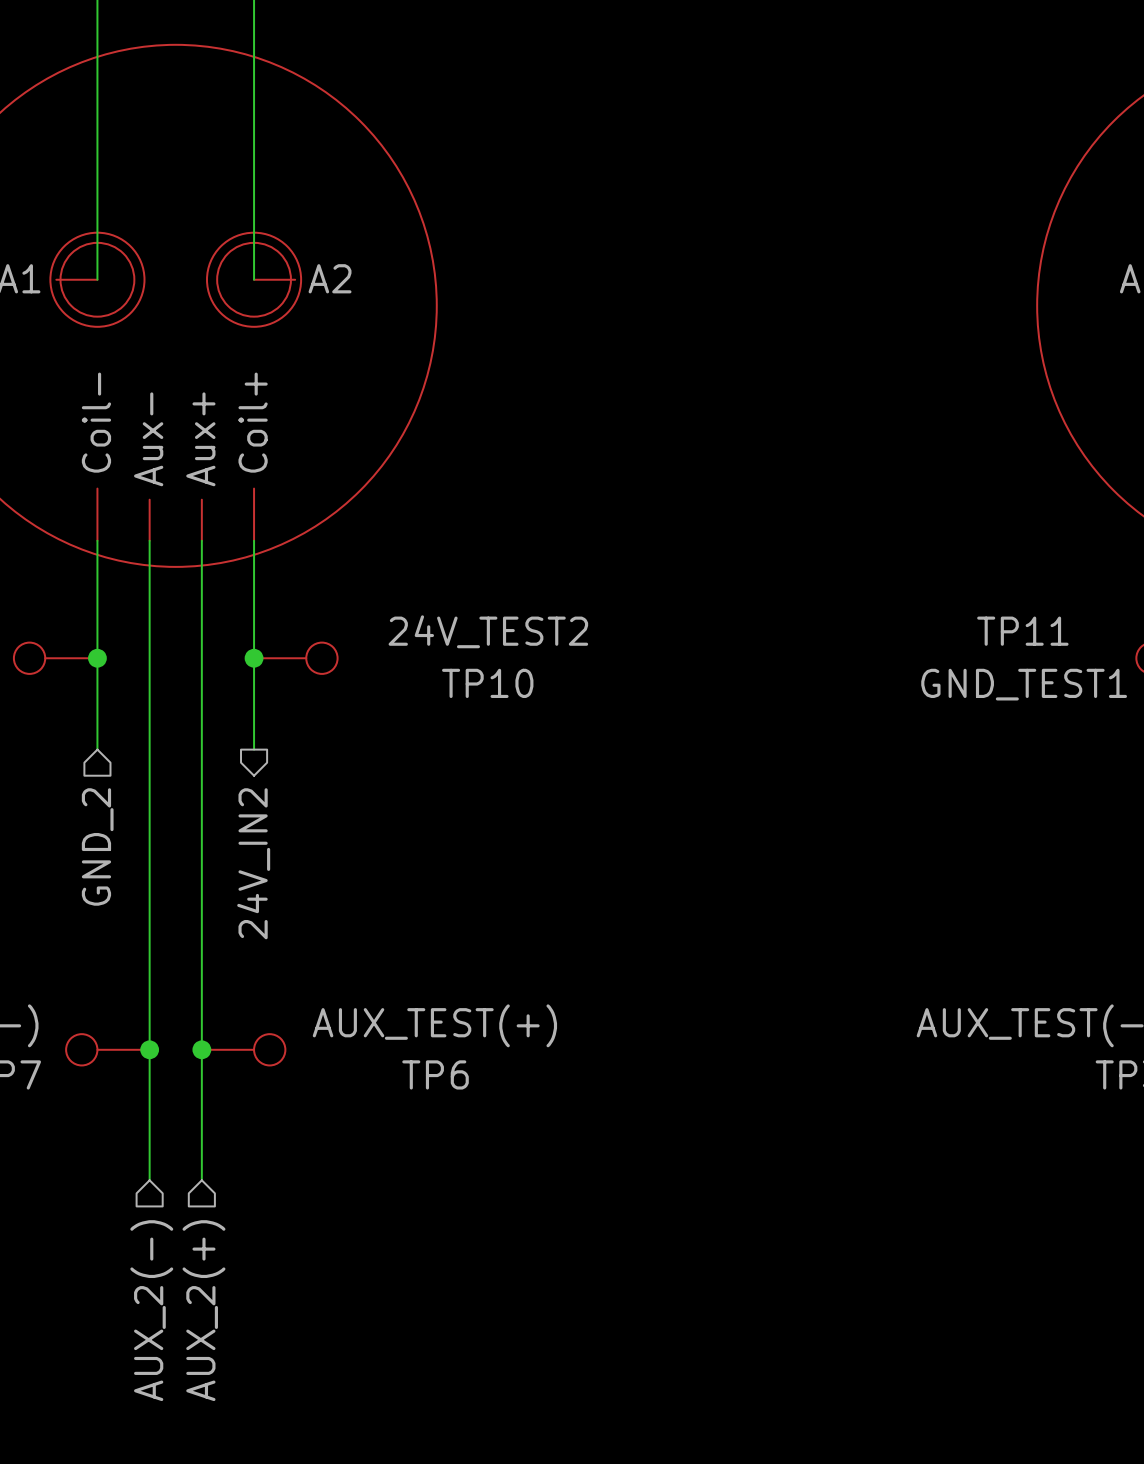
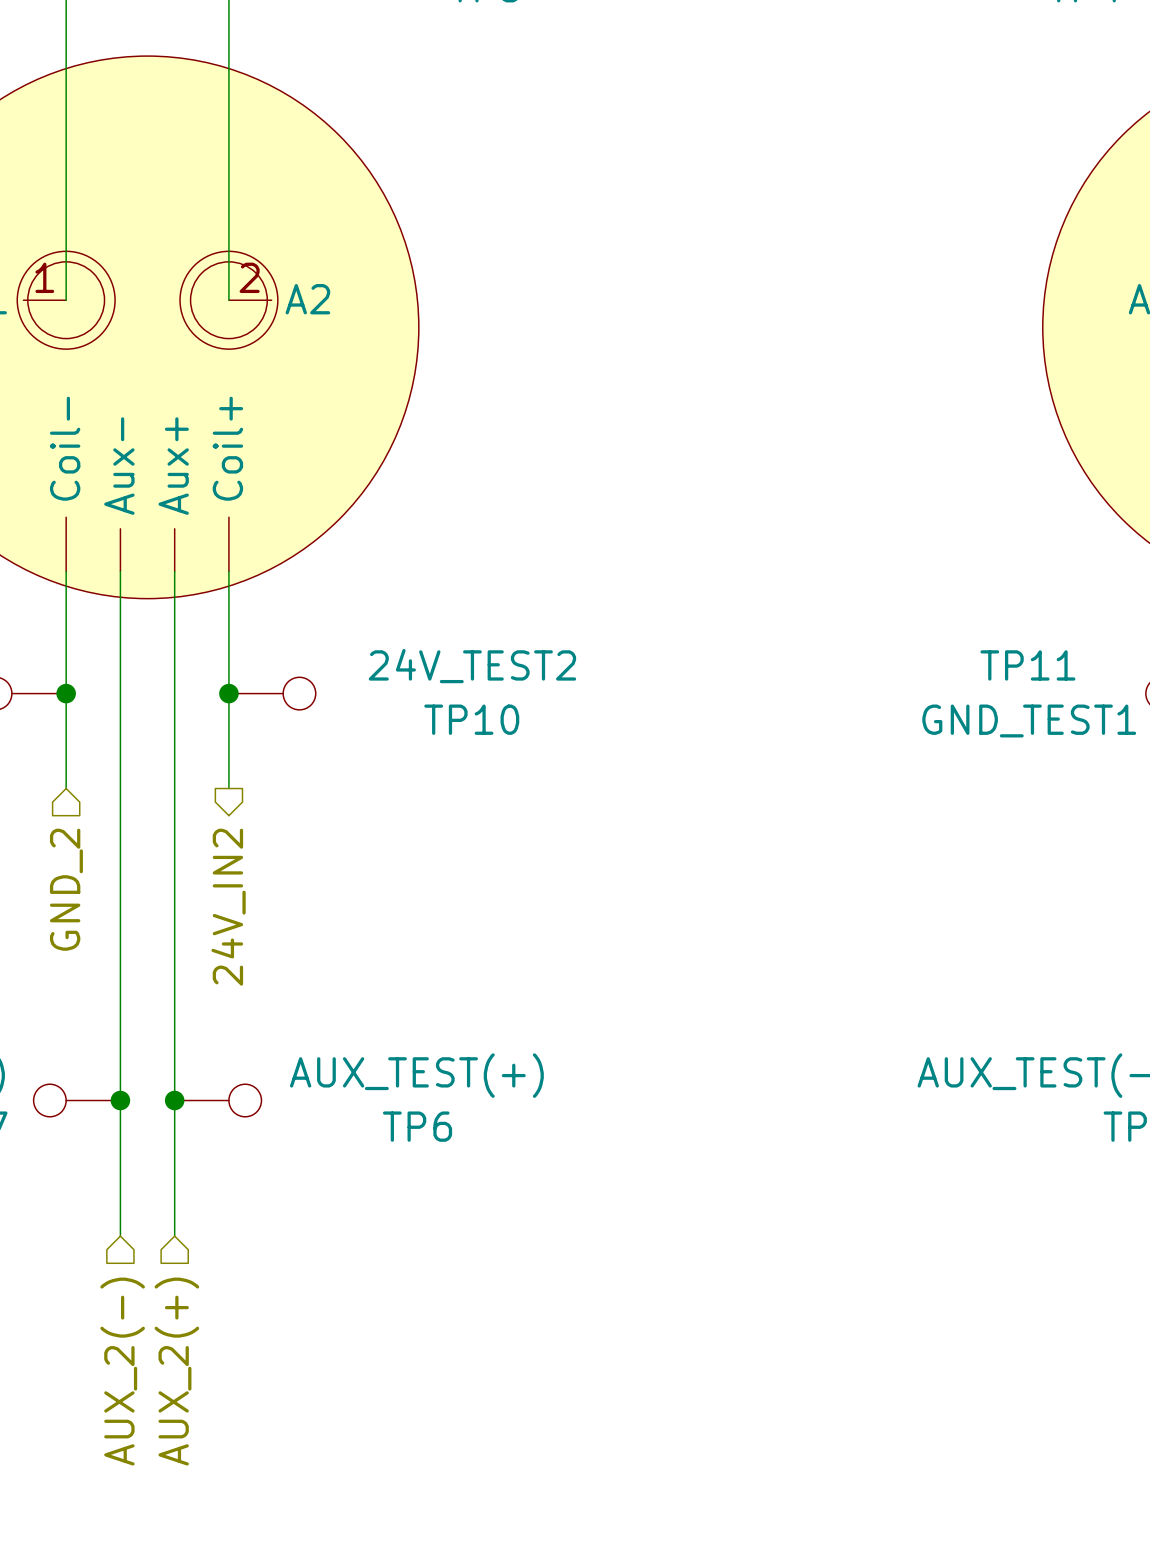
part pin number: none -> 1 (44, 277)
part pin number: none -> 2 (249, 277)

